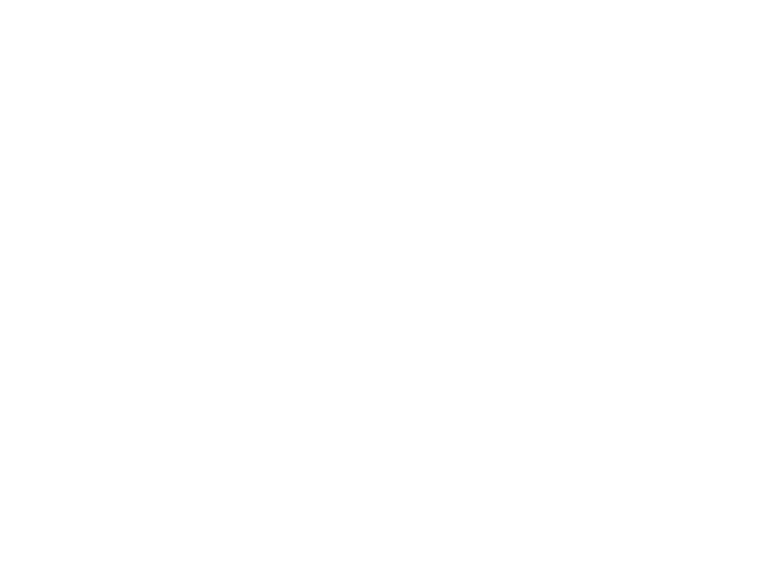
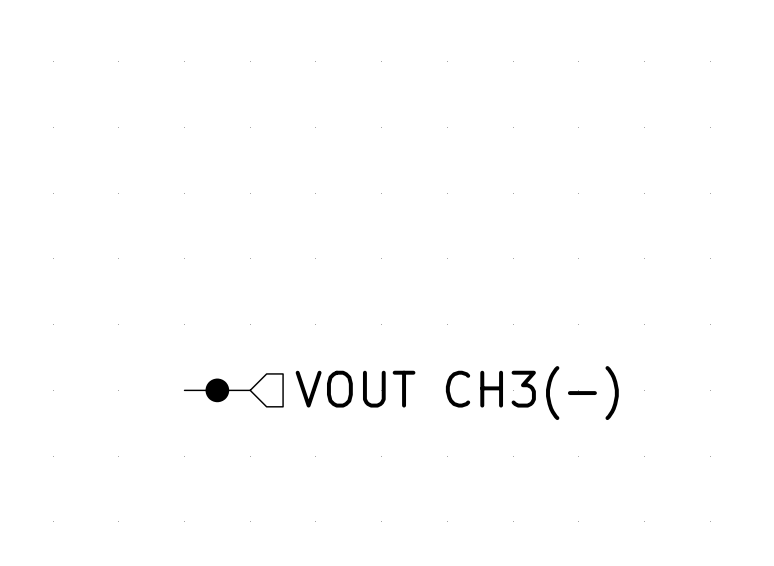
wire: none -> (184, 390) (250, 390)
junction: none -> (217, 390)
hierarchical label: none -> VOUT CH3(-) (457, 393)

